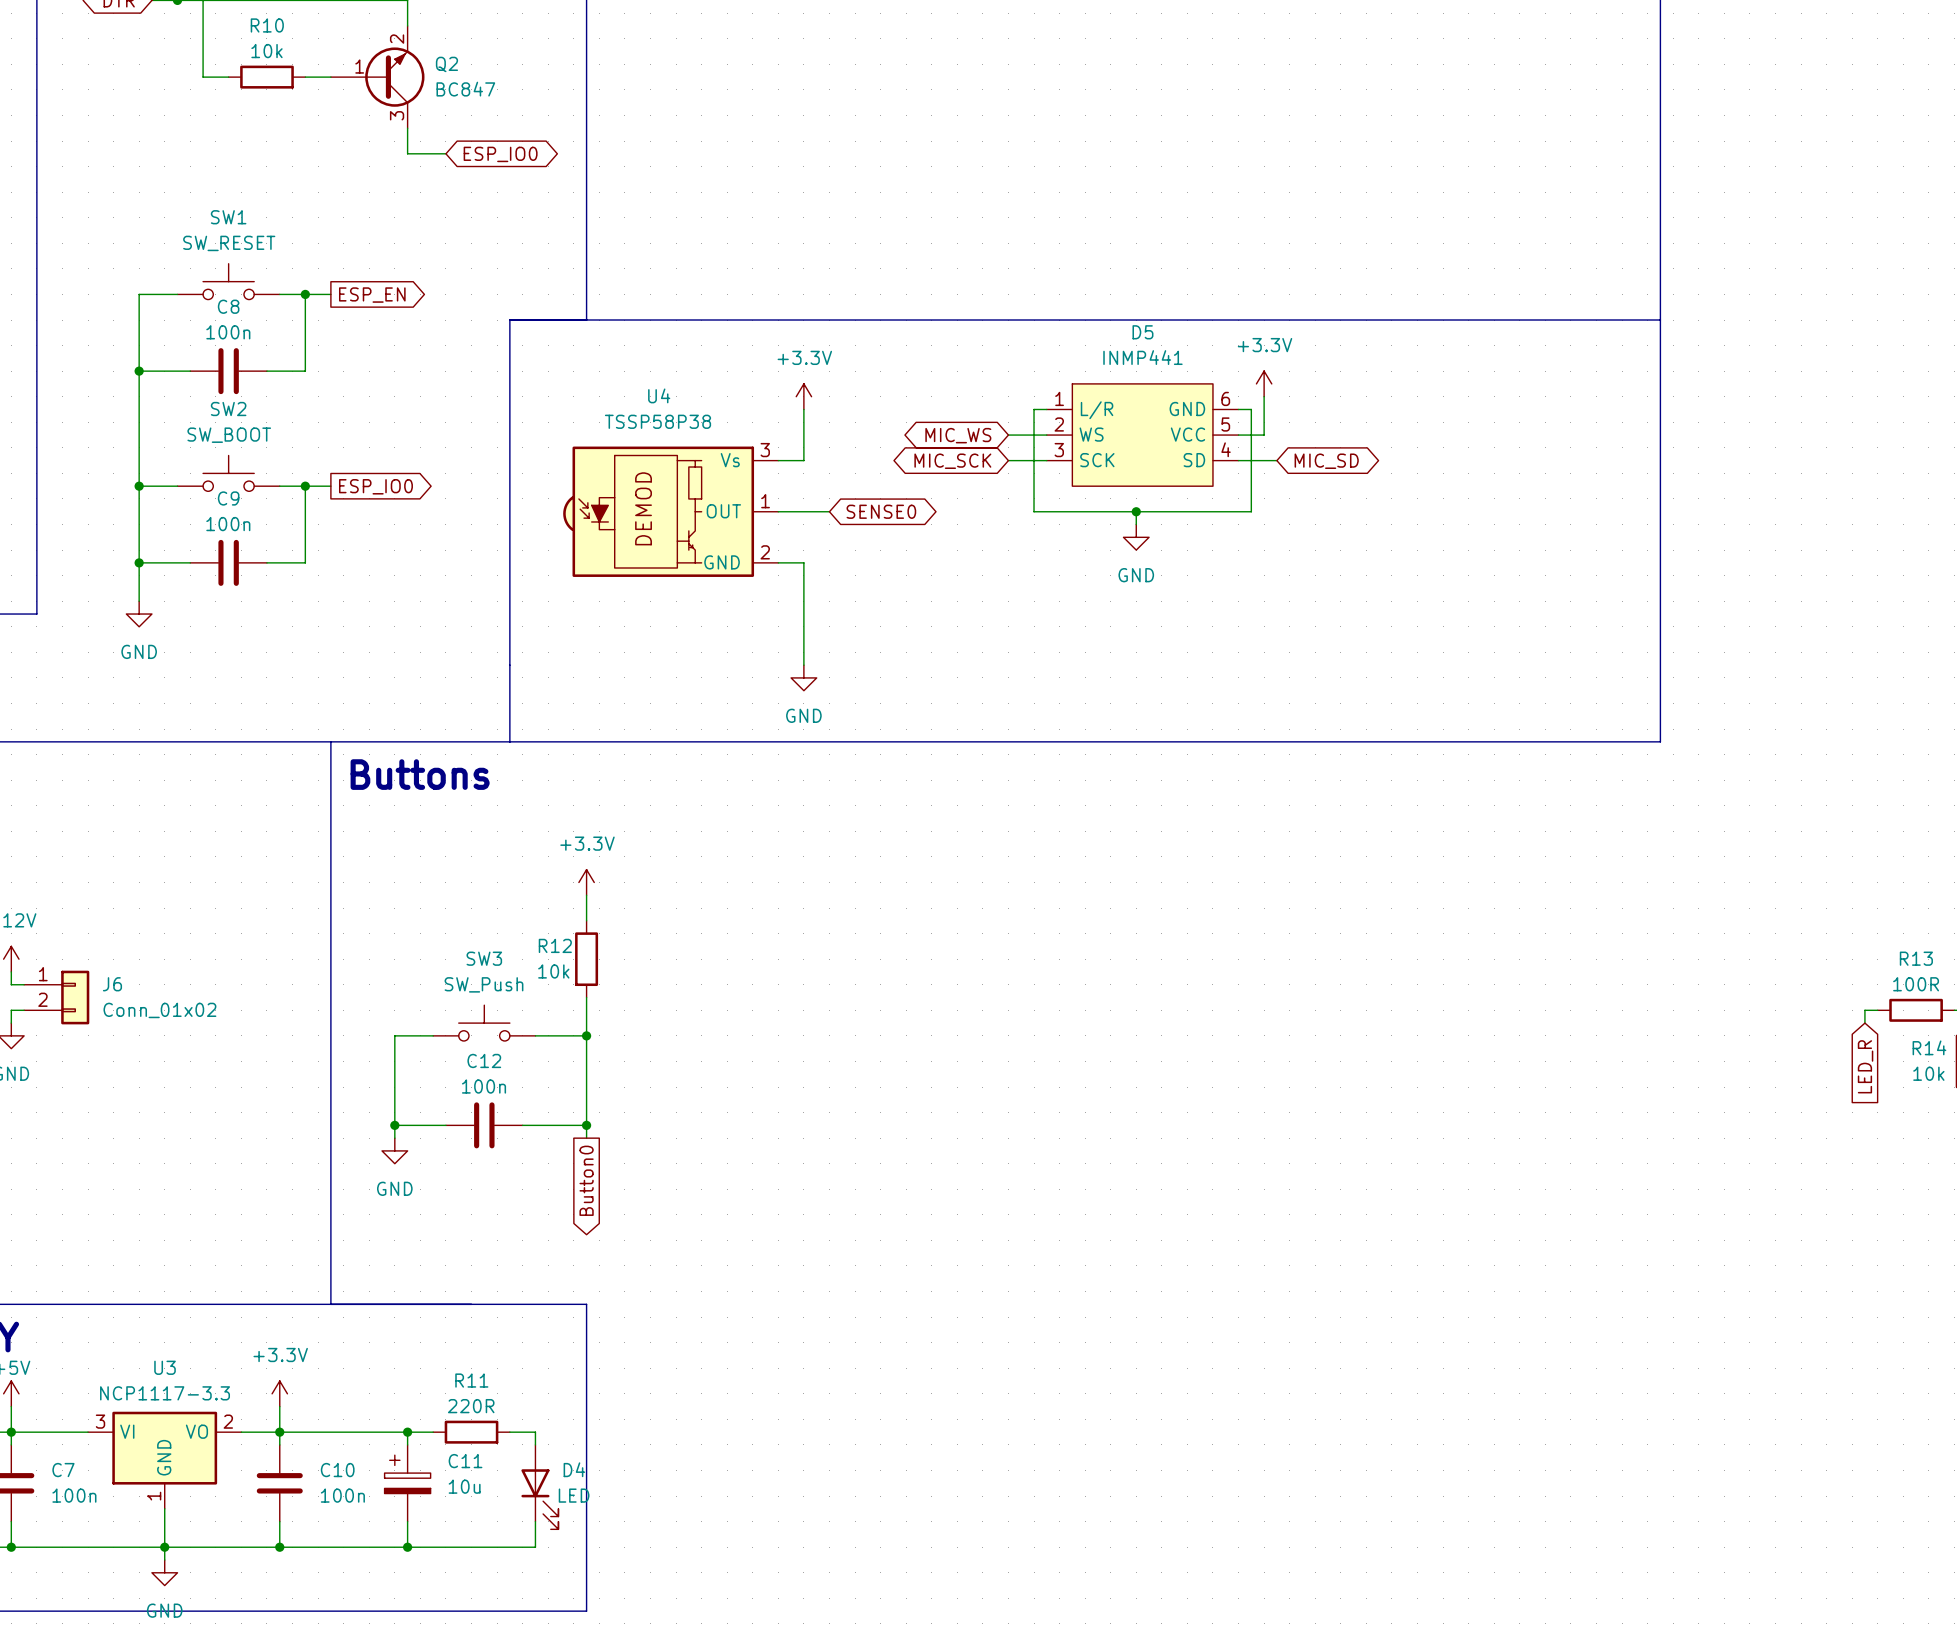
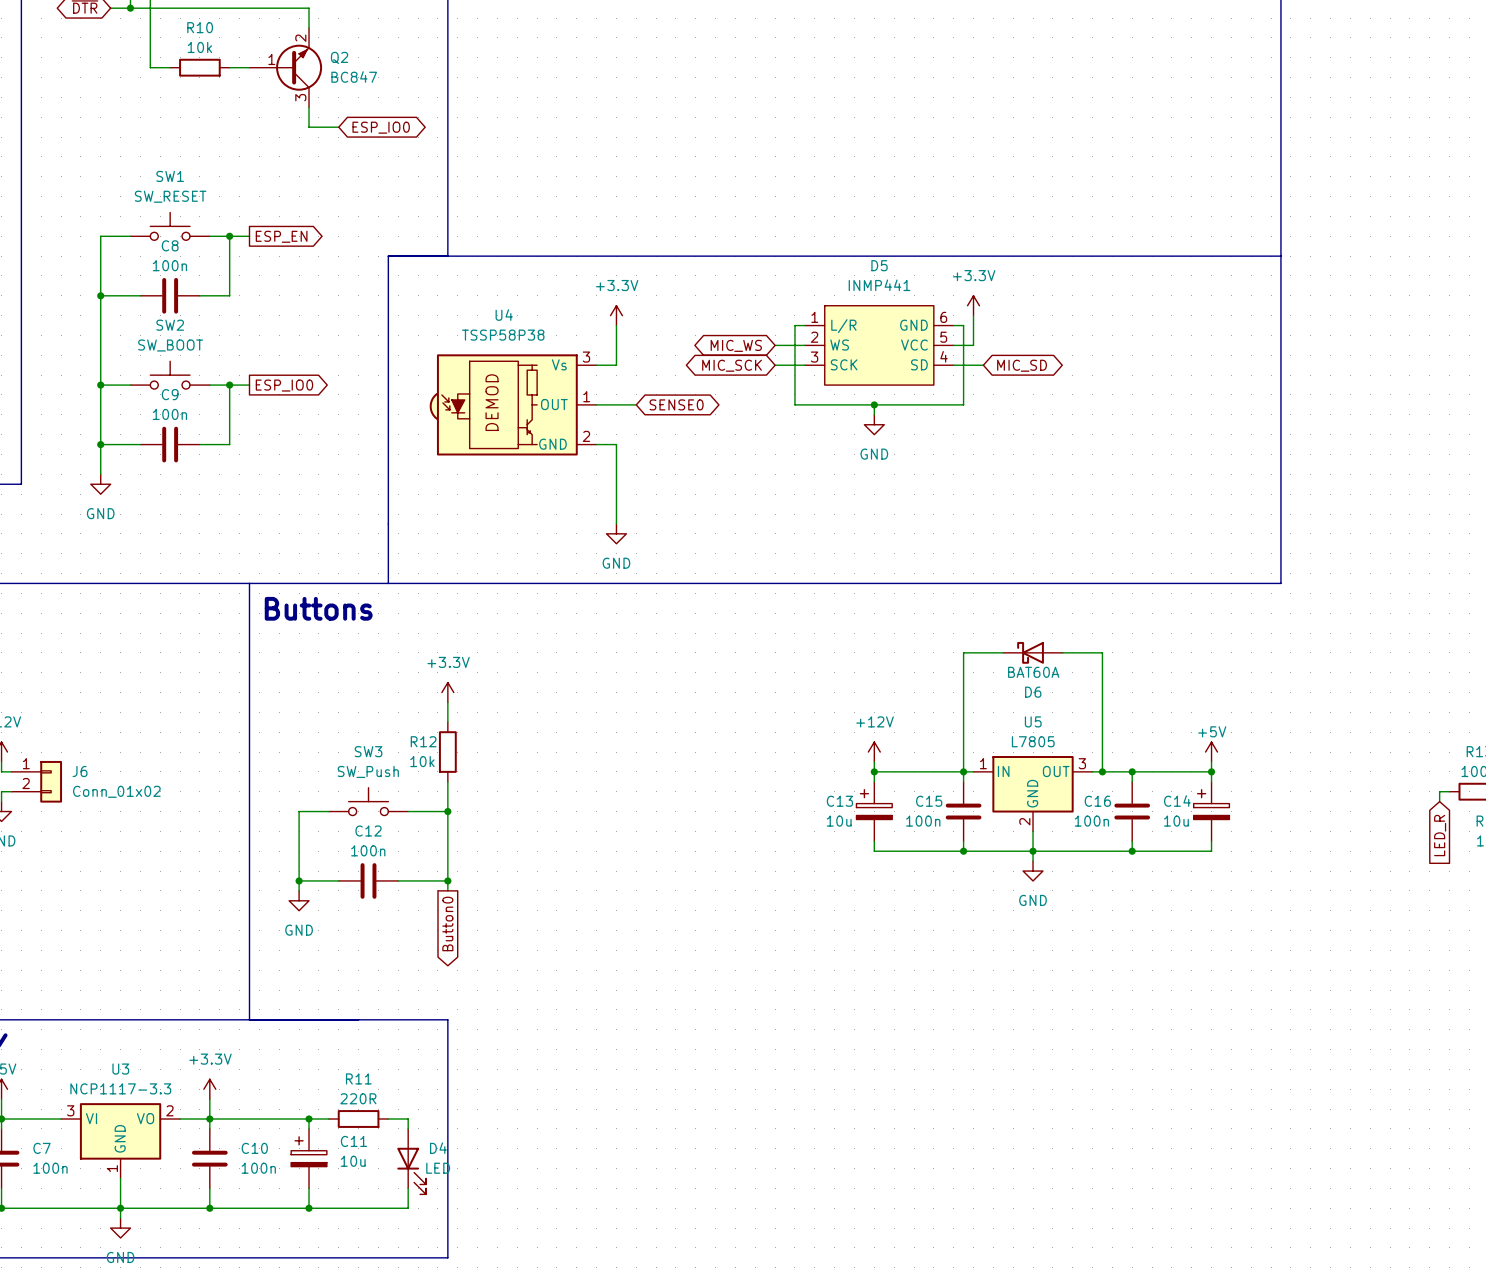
wire: none -> (1003, 652) (963, 652) (963, 781)
D6: none -> BAT60A (1033, 652)
wire: none -> (1062, 652) (1102, 652) (1102, 771)
power symbol: none -> +12V (874, 752)
power symbol: none -> +5V (1211, 752)
wire: none -> (874, 761) (874, 781)
wire: none -> (1211, 761) (1211, 781)
wire: none -> (874, 771) (973, 771)
junction: none -> (874, 771)
junction: none -> (963, 771)
wire: none -> (1092, 771) (1211, 771)
junction: none -> (1102, 771)
wire: none -> (1132, 771) (1132, 781)
junction: none -> (1132, 771)
junction: none -> (1211, 771)
U5: none -> L7805 (1033, 793)
C13: none -> 10u (874, 811)
C15: none -> 100n (963, 811)
C16: none -> 100n (1132, 811)
C14: none -> 10u (1211, 811)
wire: none -> (1033, 831) (1033, 861)
wire: none -> (874, 841) (874, 851) (1211, 851) (1211, 841)
wire: none -> (963, 841) (963, 851)
wire: none -> (1132, 841) (1132, 851)
junction: none -> (963, 851)
junction: none -> (1033, 851)
junction: none -> (1132, 851)
power symbol: none -> GND (1033, 871)

